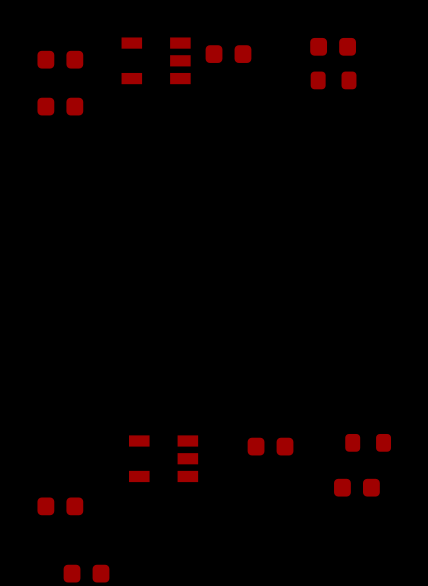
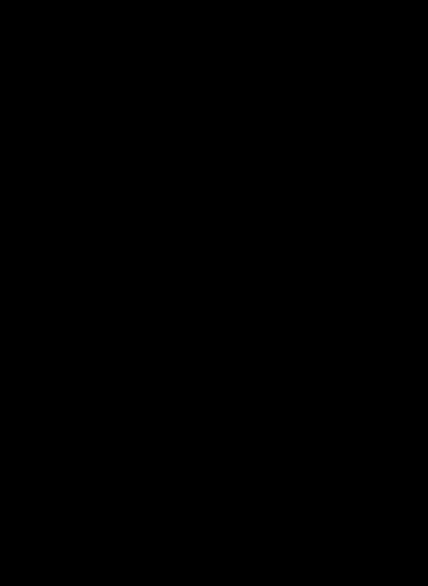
part: (333, 46) -> none
part: (228, 54) -> none
part: (60, 59) -> none
part: (156, 60) -> none
part: (333, 80) -> none
part: (60, 106) -> none
part: (368, 442) -> none
part: (270, 446) -> none
part: (163, 458) -> none
part: (356, 487) -> none
part: (60, 506) -> none
part: (86, 573) -> none

